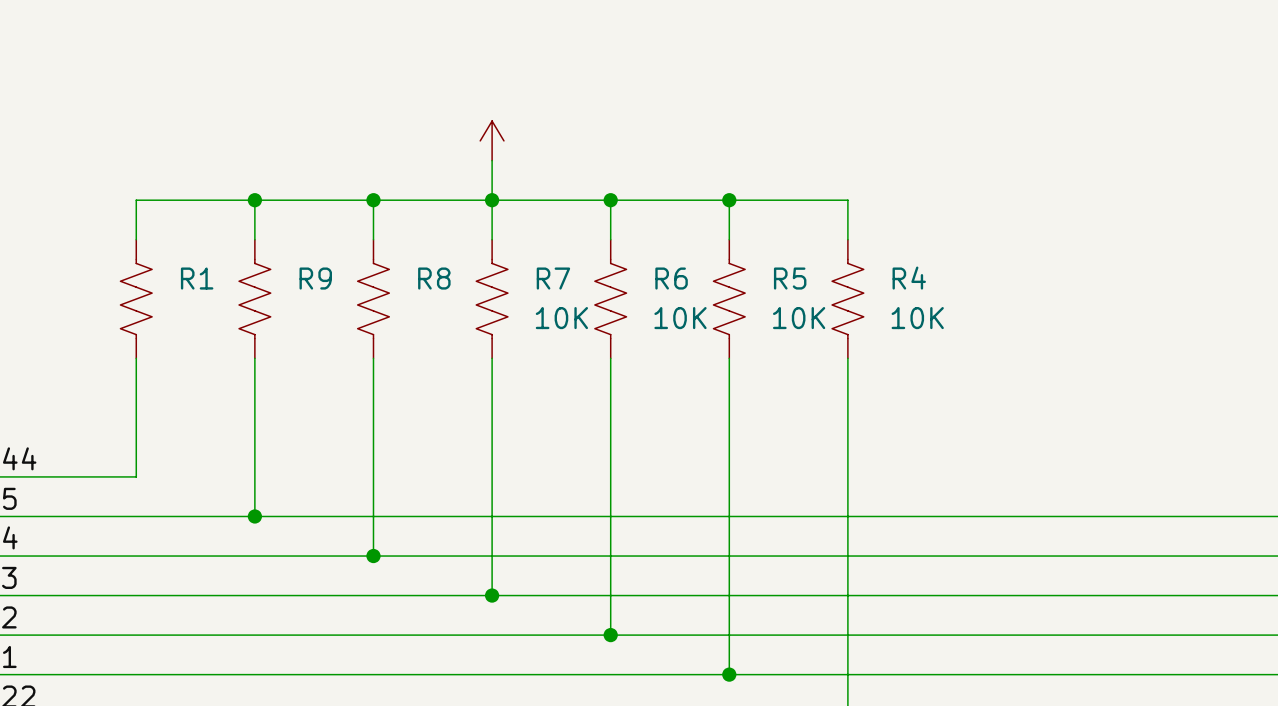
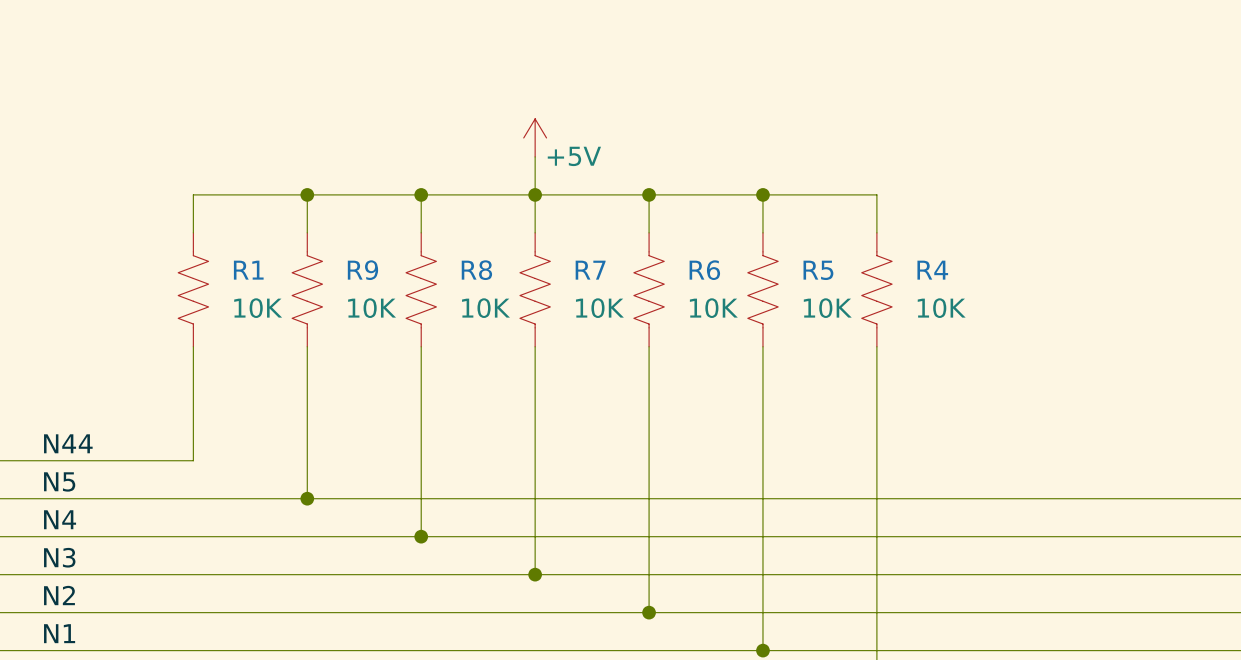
power symbol text: none -> +5V (574, 156)
R1 value: none -> 10K (258, 308)
R9 value: none -> 10K (372, 308)
R8 value: none -> 10K (486, 308)

